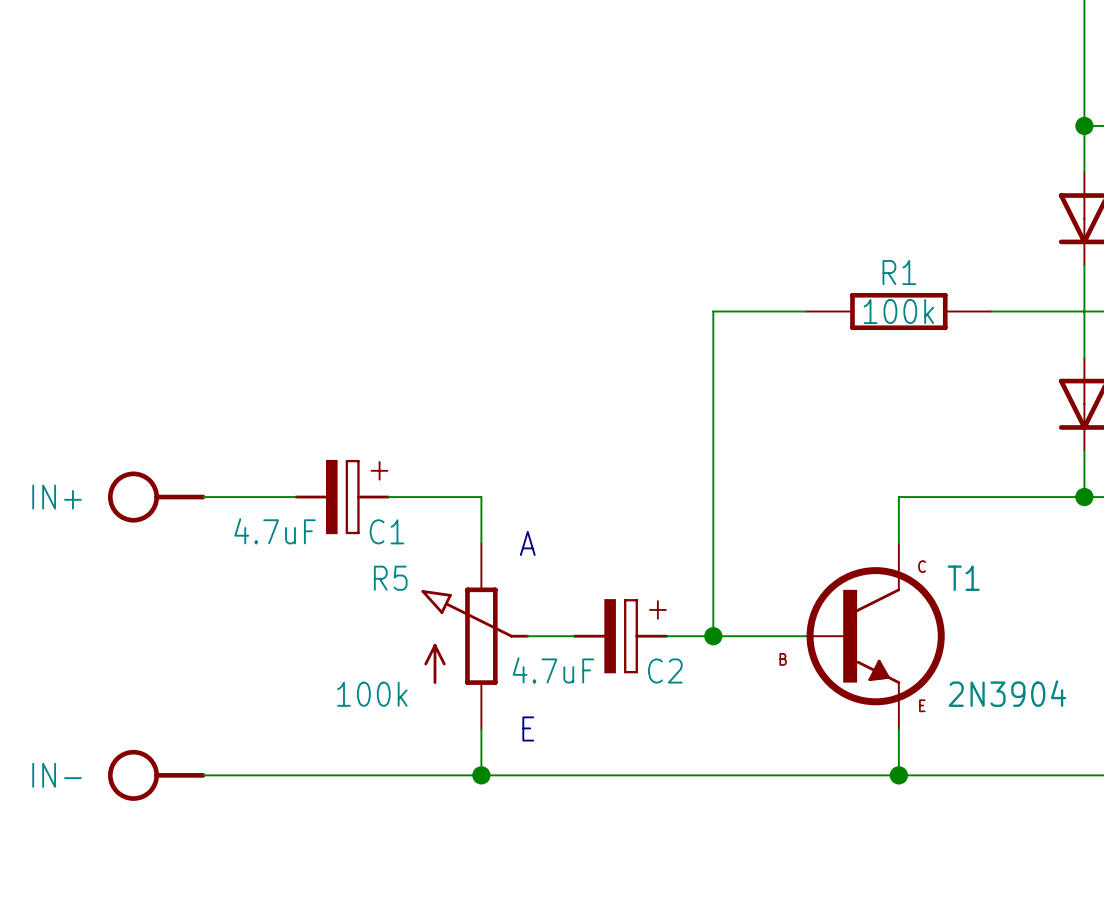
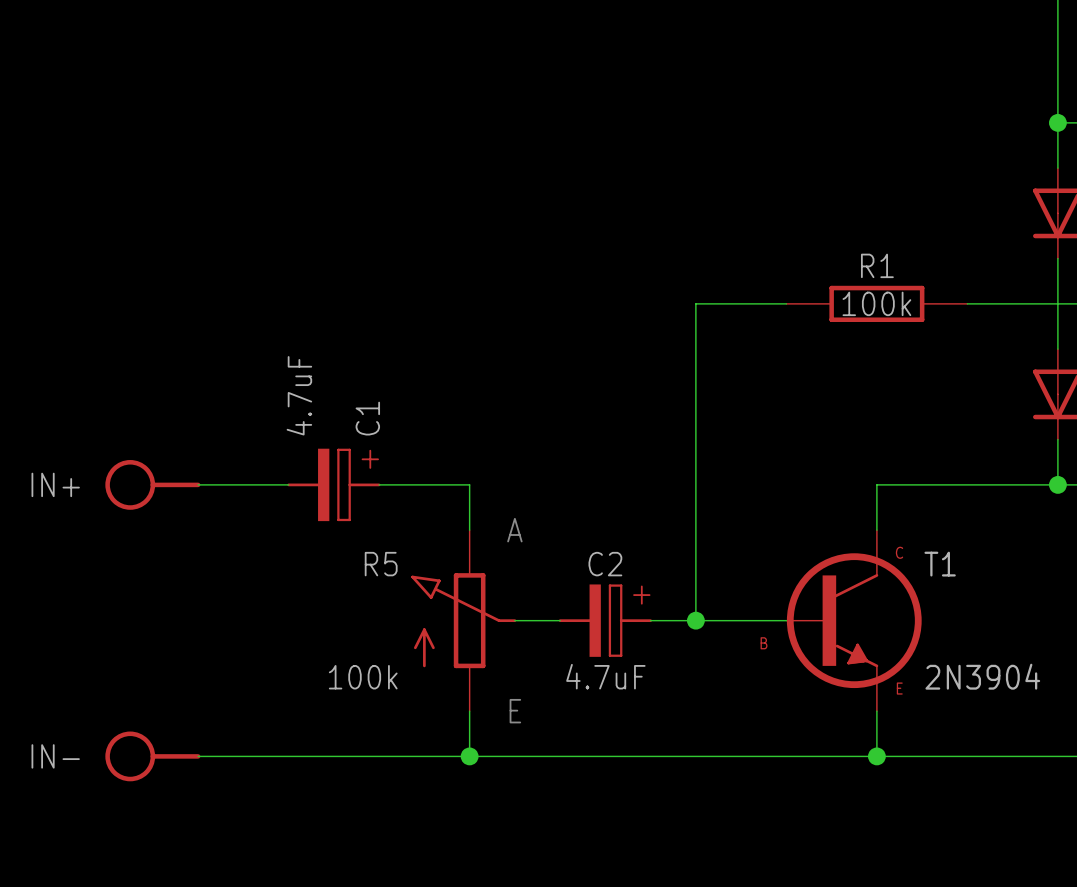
C1 value rotation: 0° (275, 531) -> 90° counterclockwise (299, 395)
C1 value position: 4.7uF (275, 531) -> 4.7uF (299, 395)
C1 name rotation: 0° (387, 531) -> 90° counterclockwise (367, 418)
C1 name position: C1 (387, 531) -> C1 (367, 418)
C2 value position: 4.7uF (553, 670) -> 4.7uF (605, 676)
C2 name position: C2 (665, 670) -> C2 (605, 564)

